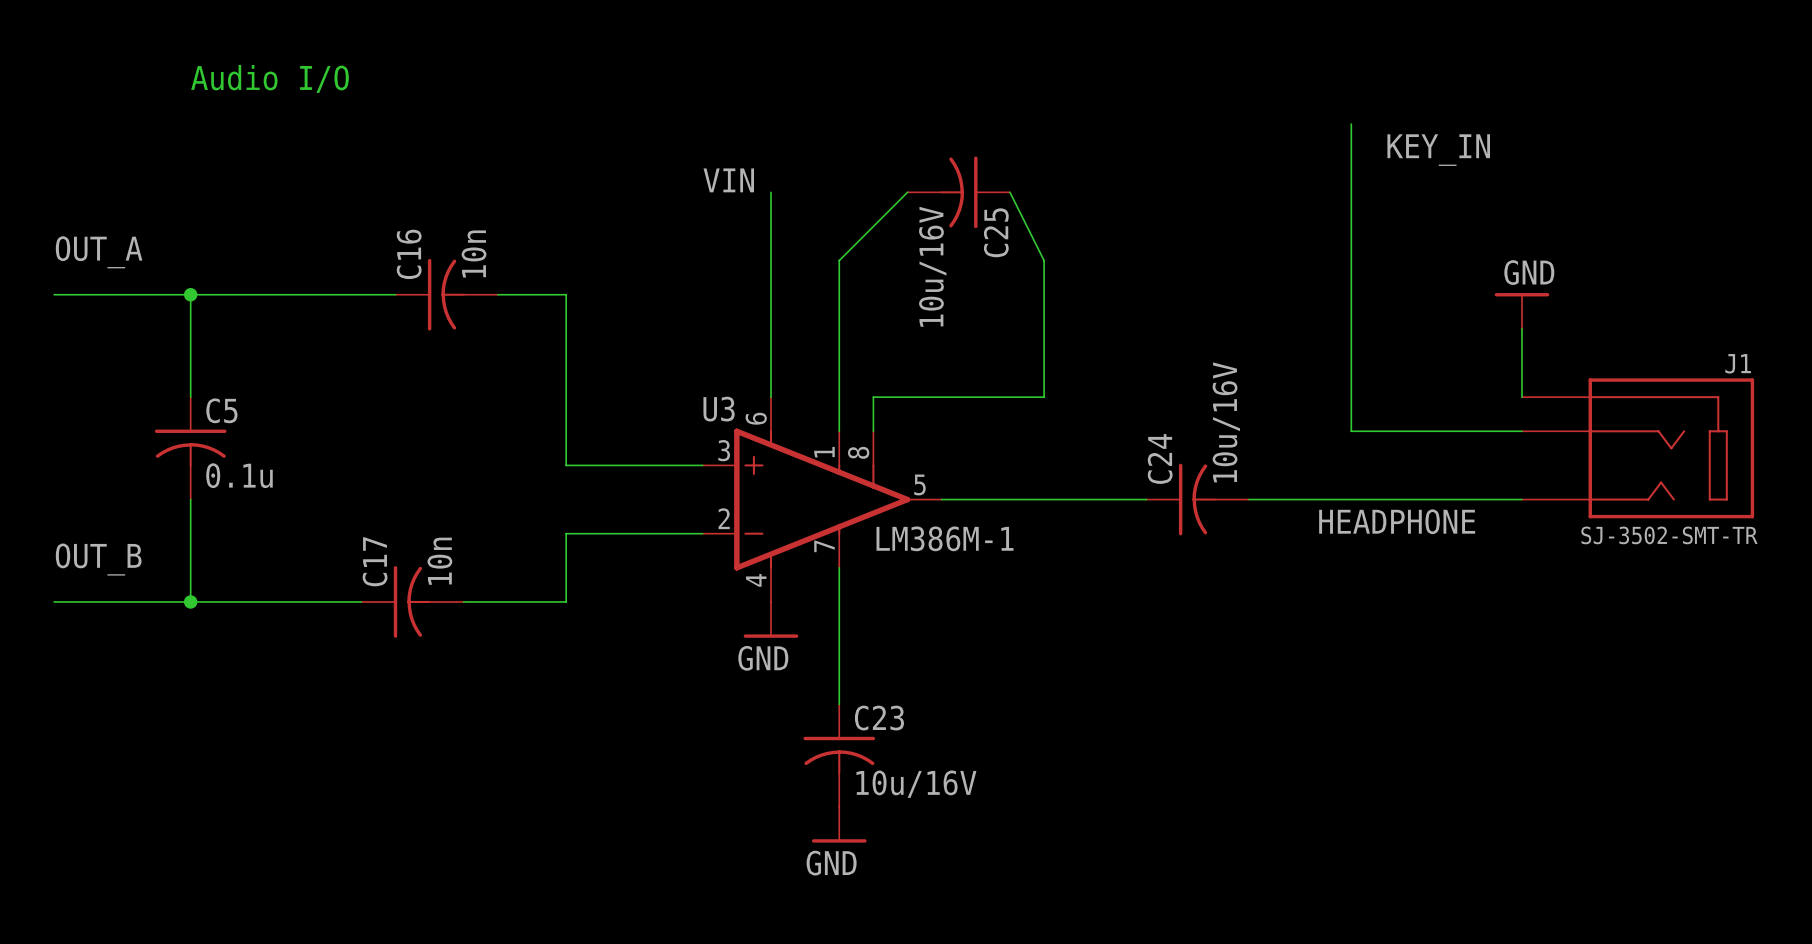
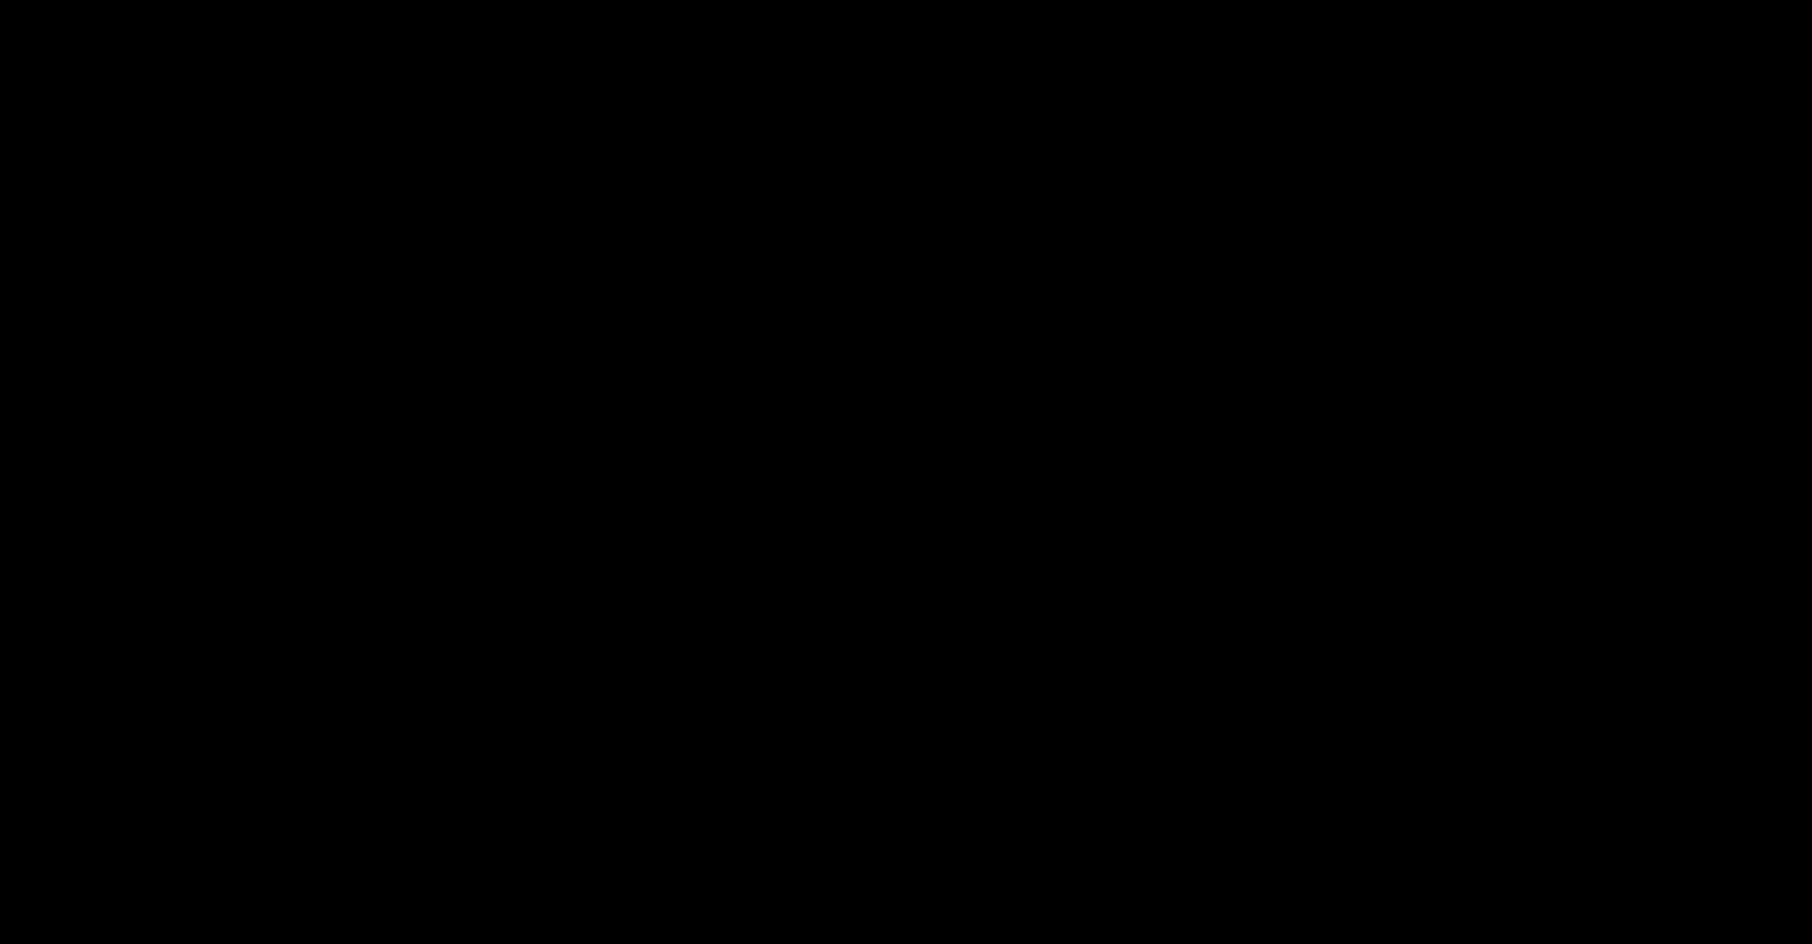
text: Audio I/O (270, 78) -> none
wire: (1351, 124) (1351, 431) (1522, 431) -> none
label: KEY_IN (1438, 150) -> none
label: VIN (728, 180) -> none
wire: (771, 192) (771, 397) -> none
wire: (907, 192) (839, 260) (839, 431) -> none
C25: 10u/16V (958, 192) -> none
wire: (1009, 192) (1044, 260) (1044, 397) (873, 397) (873, 431) -> none
label: OUT_A (99, 252) -> none
wire: (54, 294) (395, 294) -> none
wire: (190, 294) (190, 397) -> none
junction: (190, 294) -> none
C16: 10n (446, 294) -> none
wire: (497, 294) (566, 294) (566, 465) (702, 465) -> none
power symbol: GND (1522, 310) -> none
wire: (1522, 328) (1522, 397) -> none
C5: 0.1u (190, 448) -> none
J1: SJ-3502-SMT-TR (1638, 448) -> none
wire: (190, 499) (190, 601) -> none
U3: LM386M-1 (822, 499) -> none
wire: (941, 499) (1146, 499) -> none
C24: 10u/16V (1197, 499) -> none
wire: (1248, 499) (1522, 499) -> none
label: HEADPHONE (1397, 521) -> none
wire: (702, 533) (566, 533) (566, 601) (463, 601) -> none
label: OUT_B (98, 559) -> none
wire: (839, 567) (839, 704) -> none
wire: (54, 601) (361, 601) -> none
junction: (190, 601) -> none
C17: 10n (412, 601) -> none
power symbol: GND (771, 619) -> none
C23: 10u/16V (839, 755) -> none
power symbol: GND (839, 824) -> none

